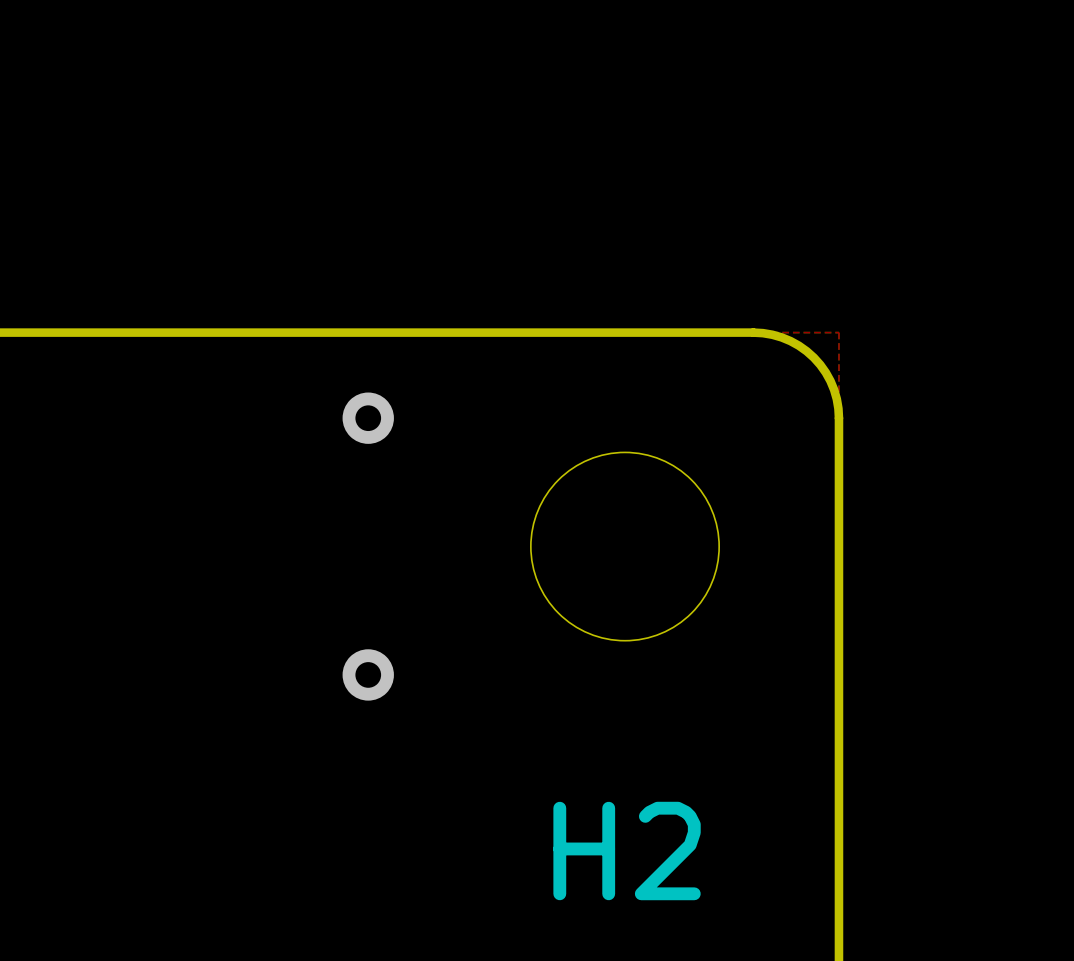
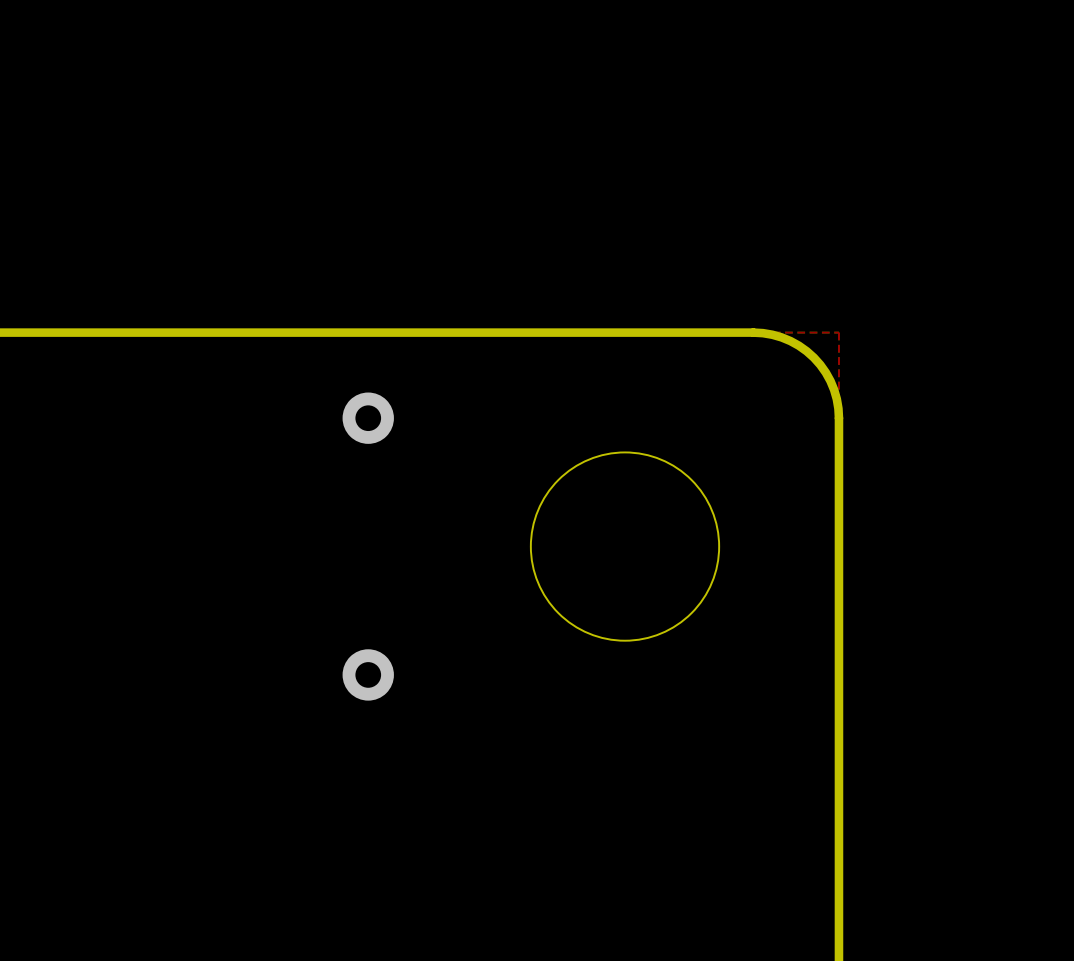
H2 name: H2 (627, 851) -> none

